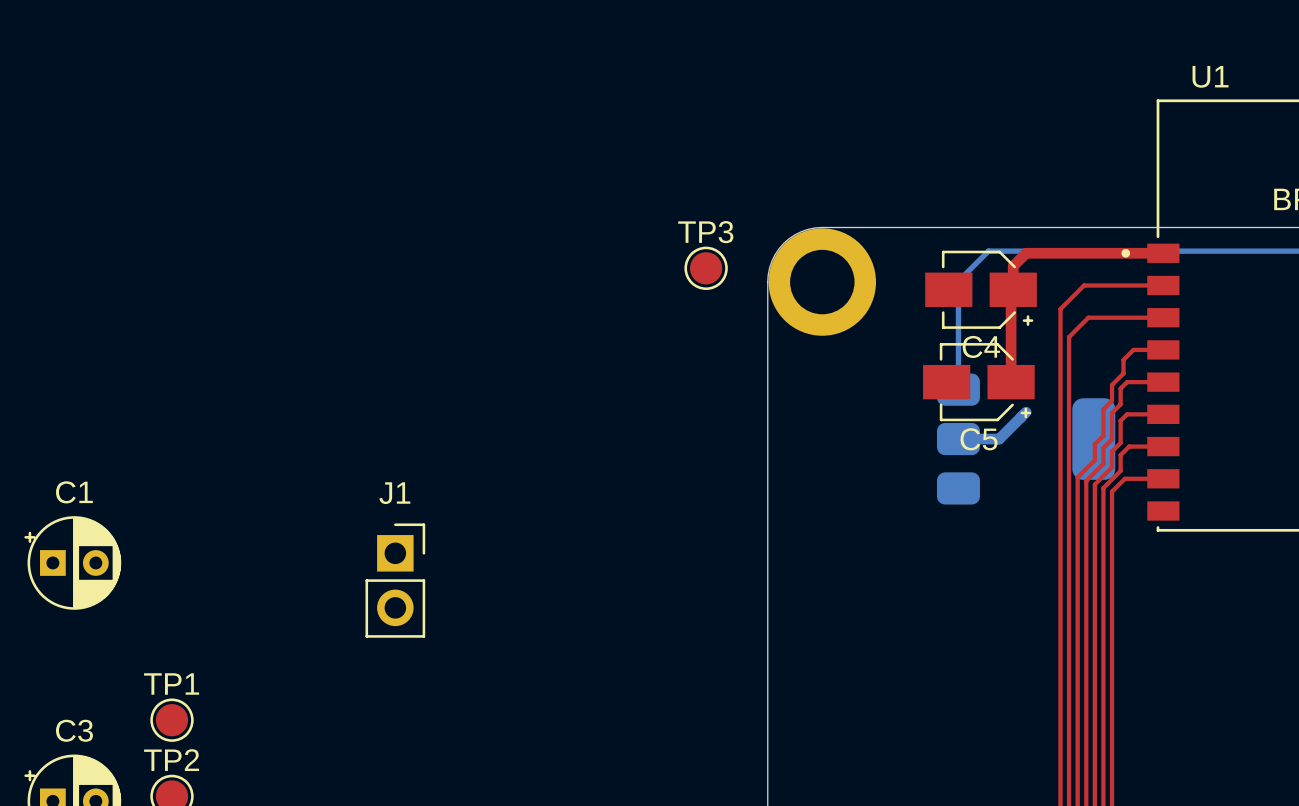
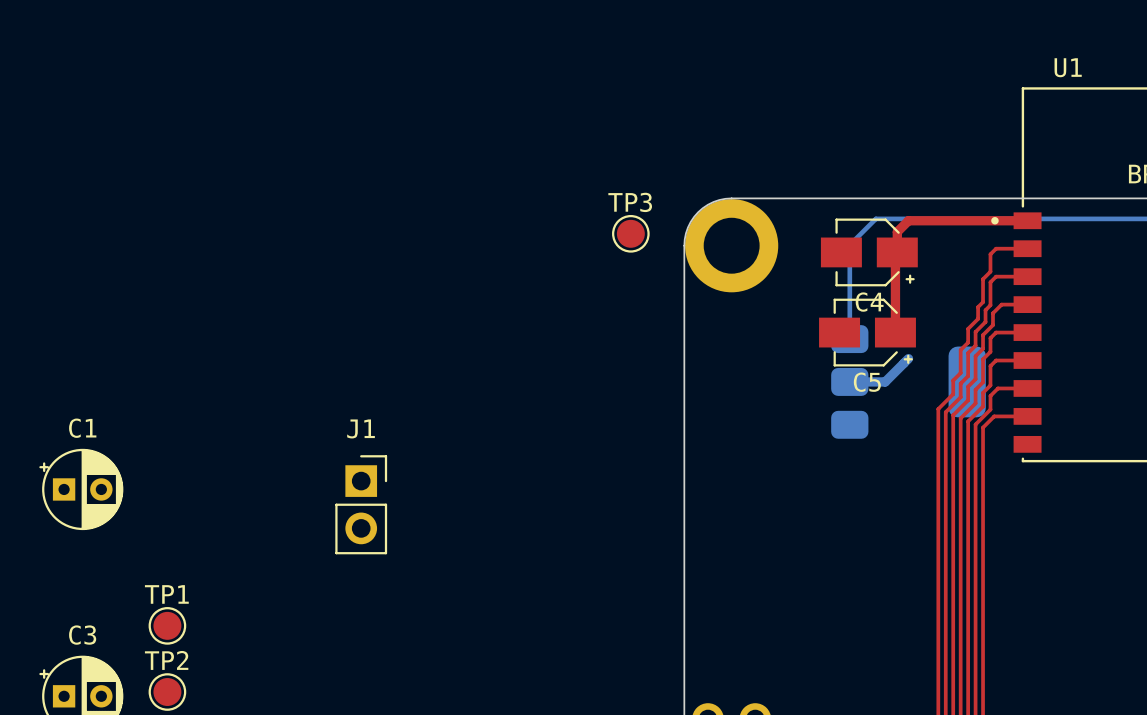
top track: (1127, 285) (1084, 285) (1060, 309) (1060, 470) -> (996, 248) (990, 254) (990, 271) (983, 279) (983, 302) (978, 307) (978, 318) (968, 328) (968, 342) (960, 350) (960, 373) (953, 380) (953, 394) (938, 409)
top track: (1127, 317) (1088, 317) (1069, 337) (1069, 473) -> (996, 276) (990, 282) (990, 305) (985, 310) (985, 322) (975, 331) (975, 345) (968, 353) (968, 376) (960, 383) (960, 397) (945, 412)

